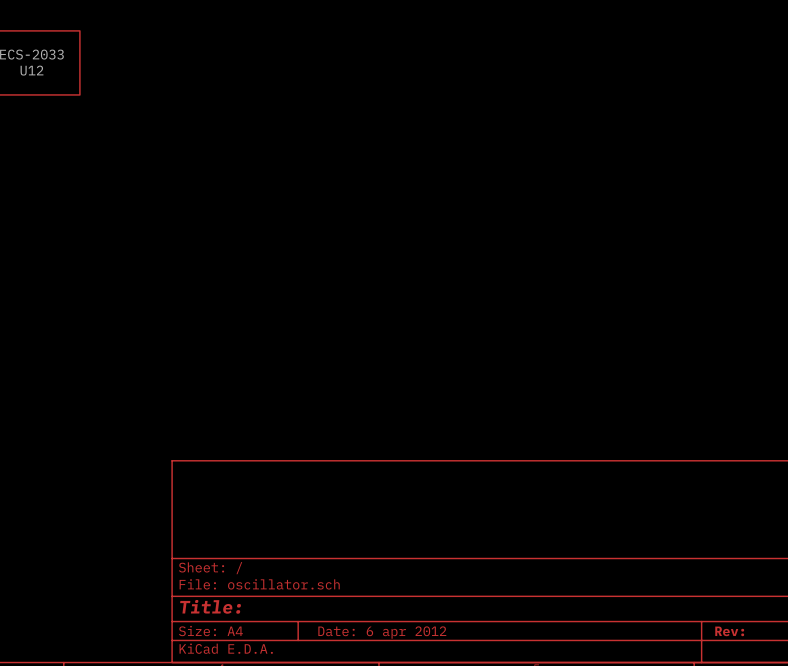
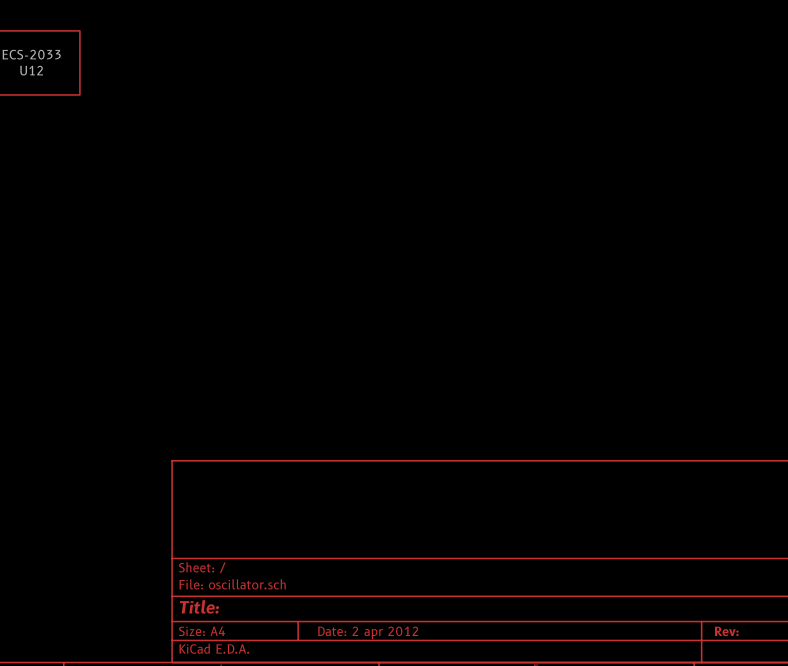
title block: Date: 6 apr 2012 (382, 632) -> Date: 2 apr 2012 (368, 632)

